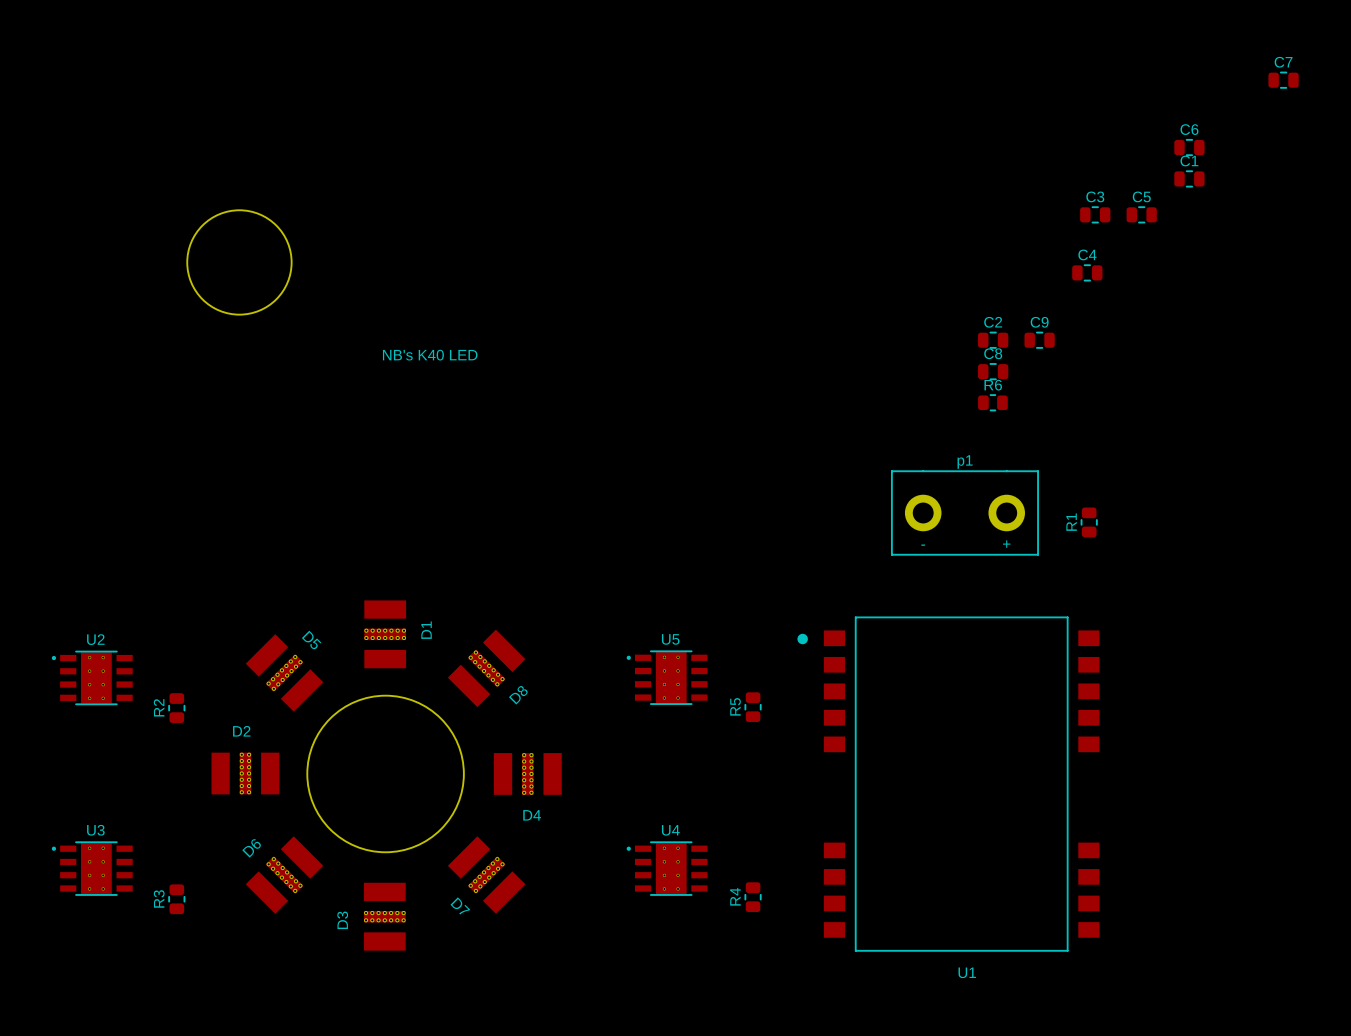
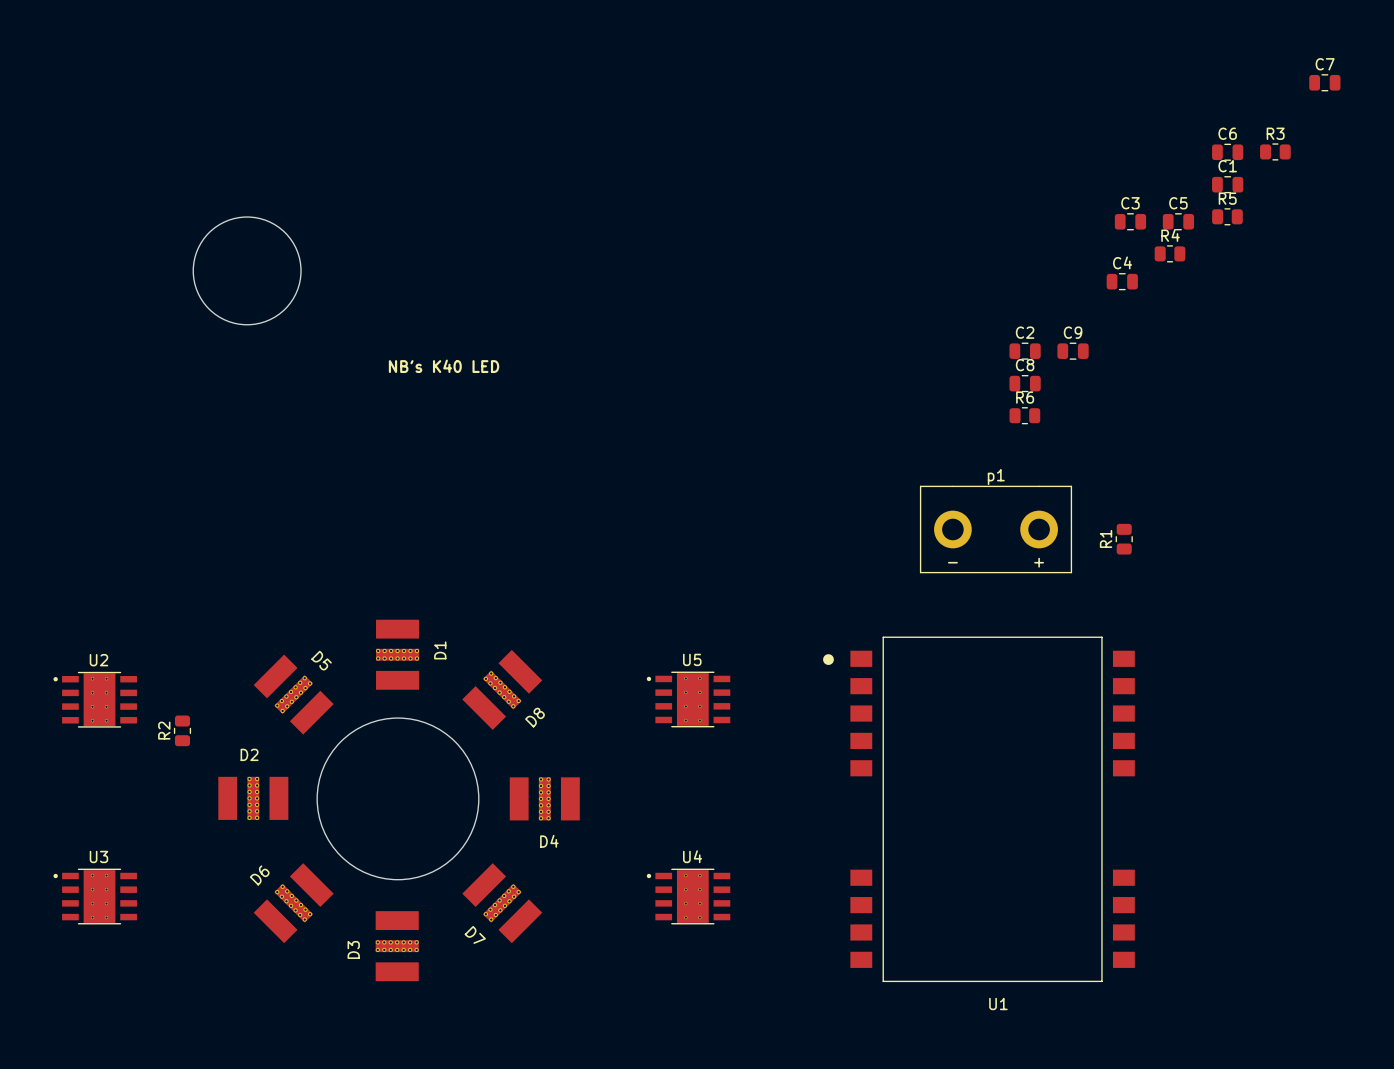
R5 rotation: 0° (753, 707) -> 90° clockwise (1227, 216)
R5 position: (753, 707) -> (1227, 216)
R4 rotation: 0° (753, 897) -> 90° clockwise (1170, 253)
R4 position: (753, 897) -> (1170, 253)
R3 rotation: 0° (176, 899) -> 90° clockwise (1275, 151)
R3 position: (176, 899) -> (1275, 151)

